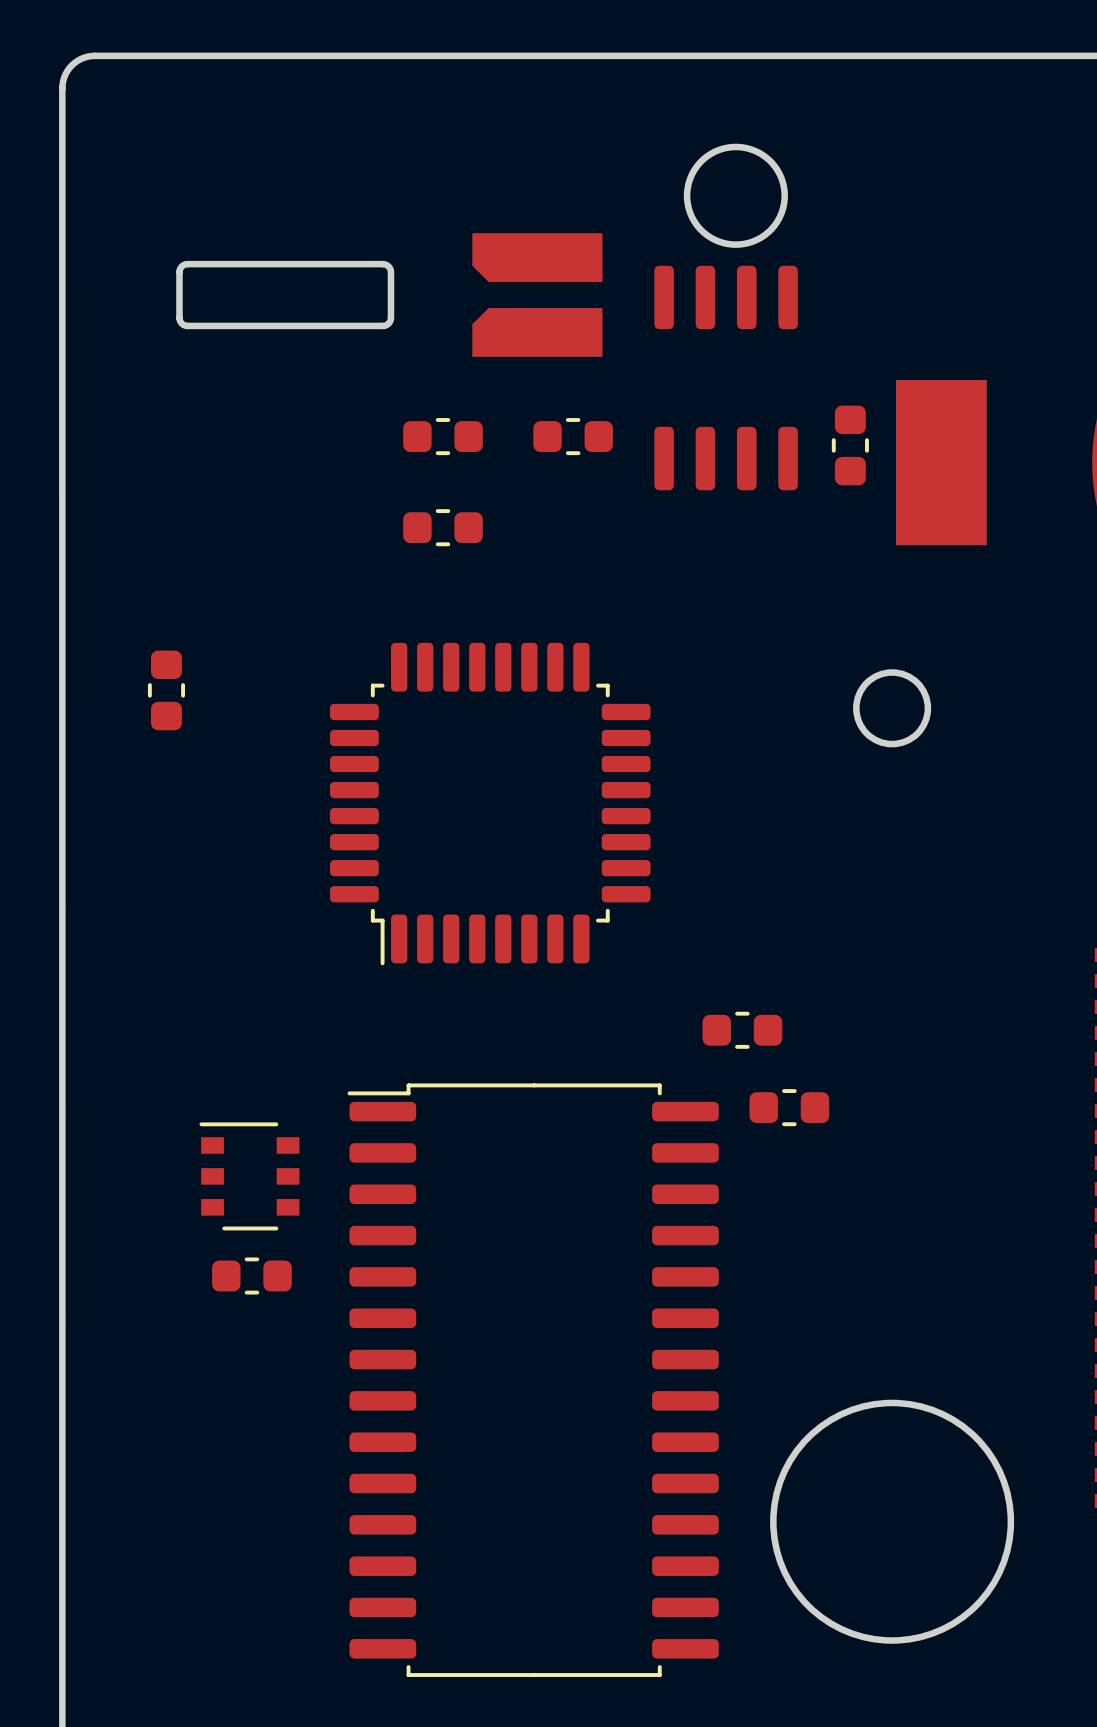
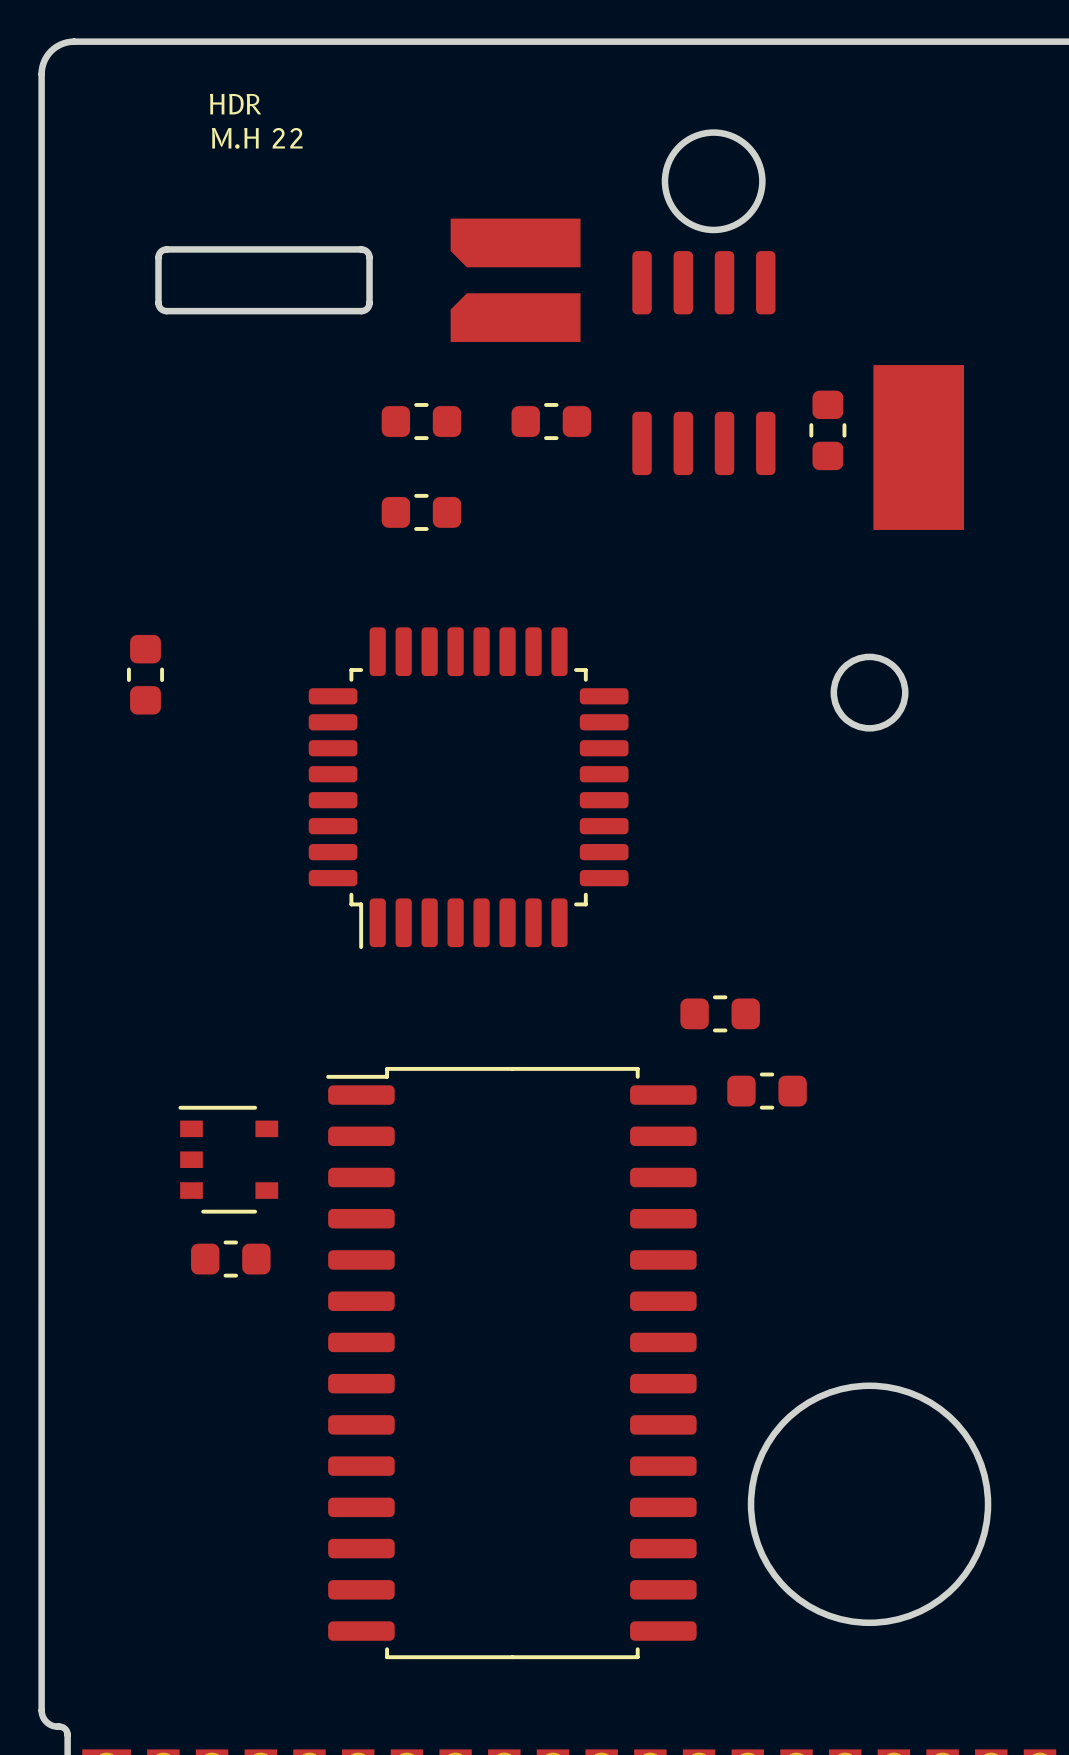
text: none -> HDR (235, 104)
text: none -> M.H 22 (257, 138)
part footprint: [199, 1122, 300, 1231] -> [178, 1105, 279, 1214]

